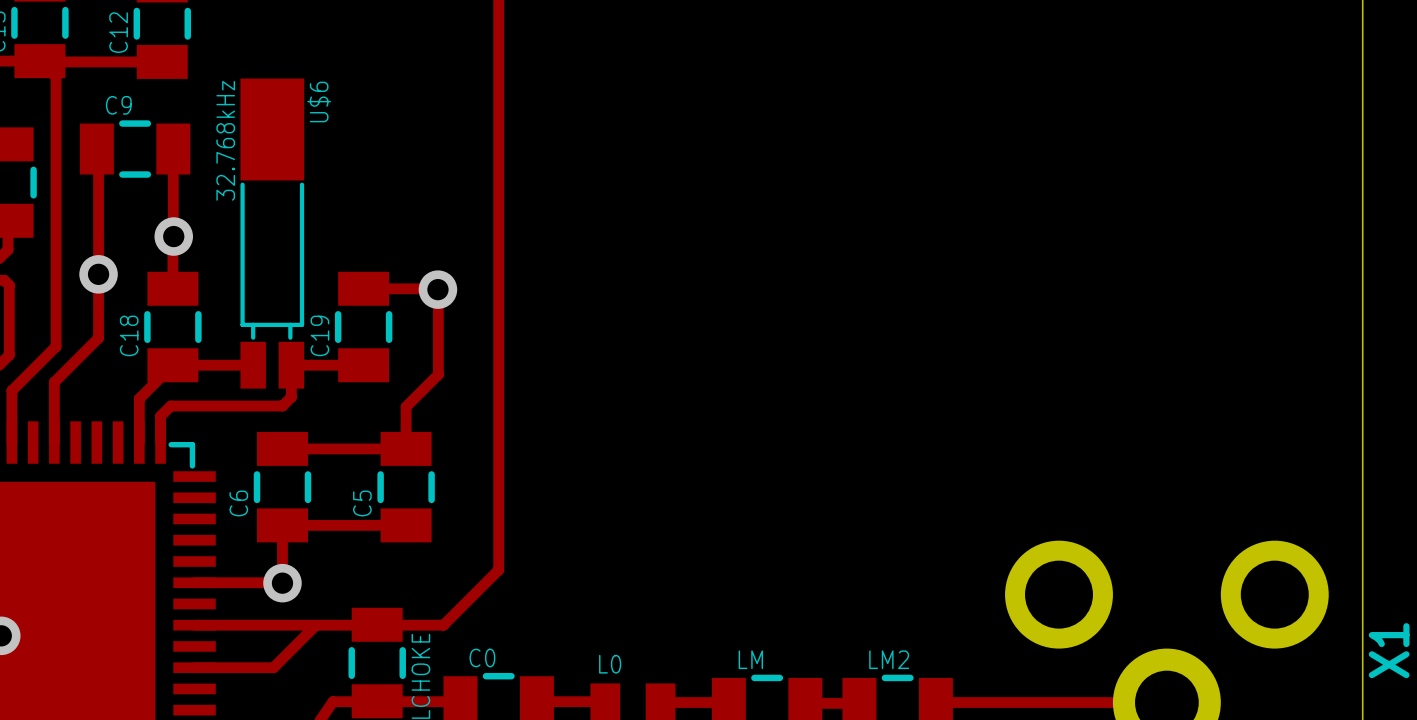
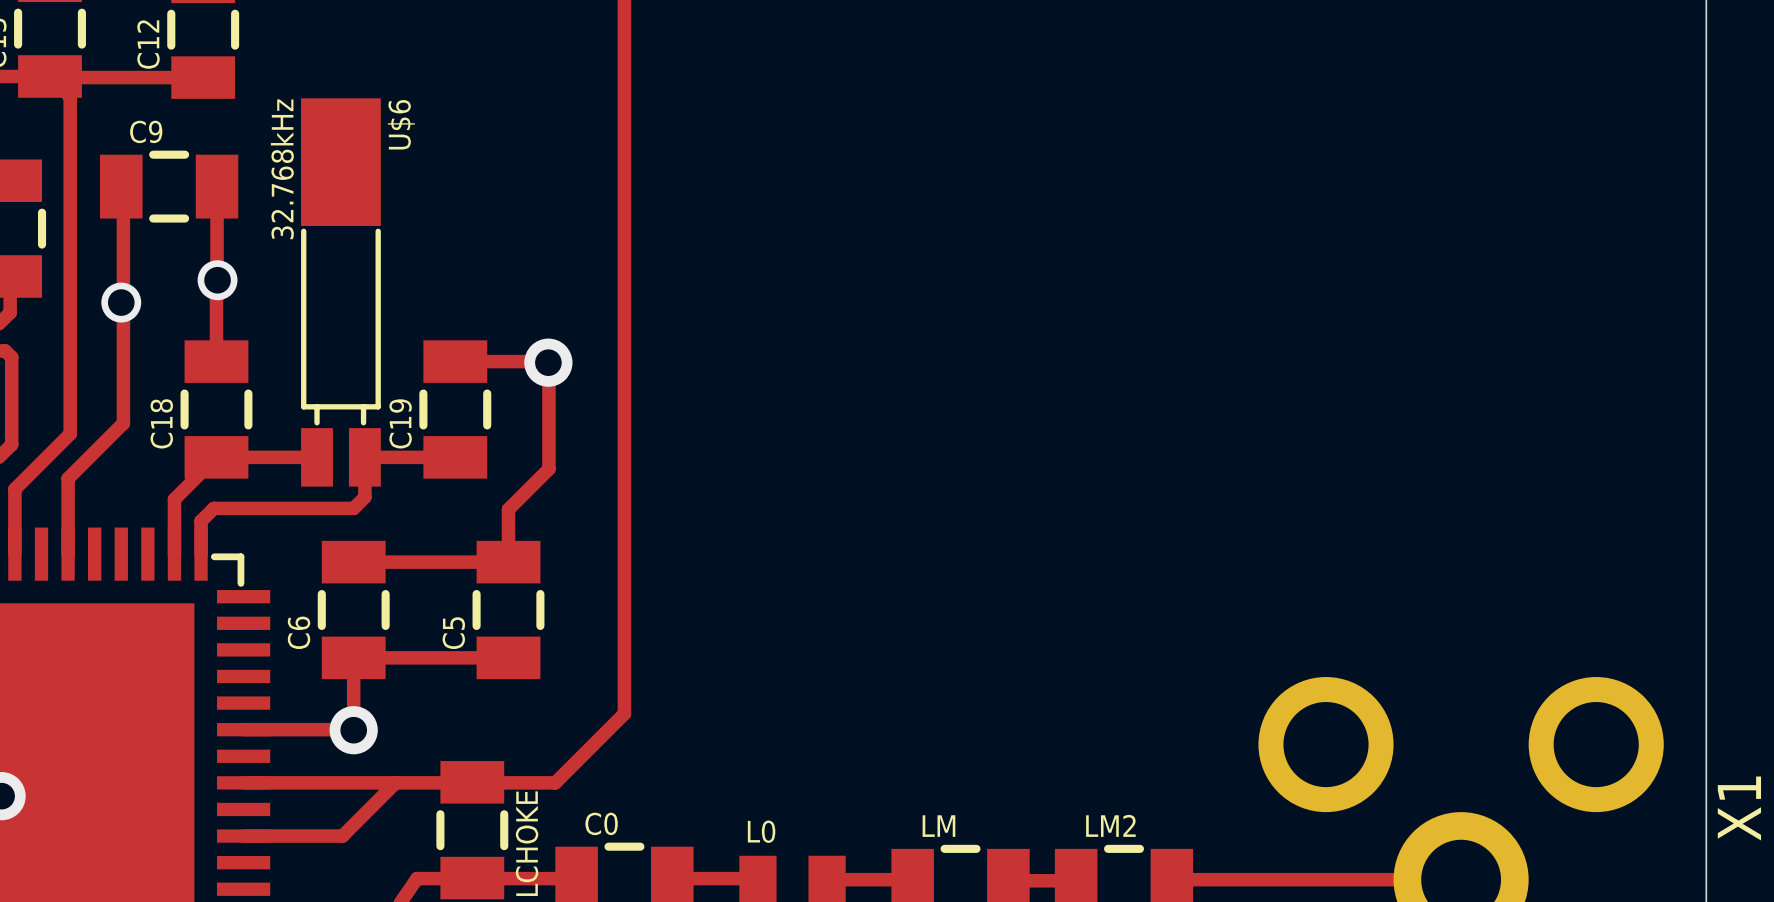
via size: [154, 217, 193, 256] -> [197, 260, 238, 301]
via position: (98, 274) -> (121, 302)

